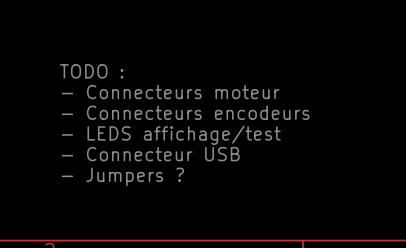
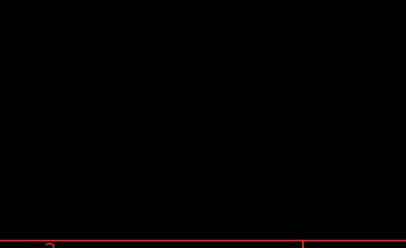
text: TODO : (91, 71) -> none
text: - Connecteurs moteur (170, 92) -> none
text: - Connecteurs encodeurs (185, 112) -> none
text: - LEDS affichage/test (171, 135) -> none
text: - Connecteur USB (150, 154) -> none
text: - Jumpers ? (122, 176) -> none

